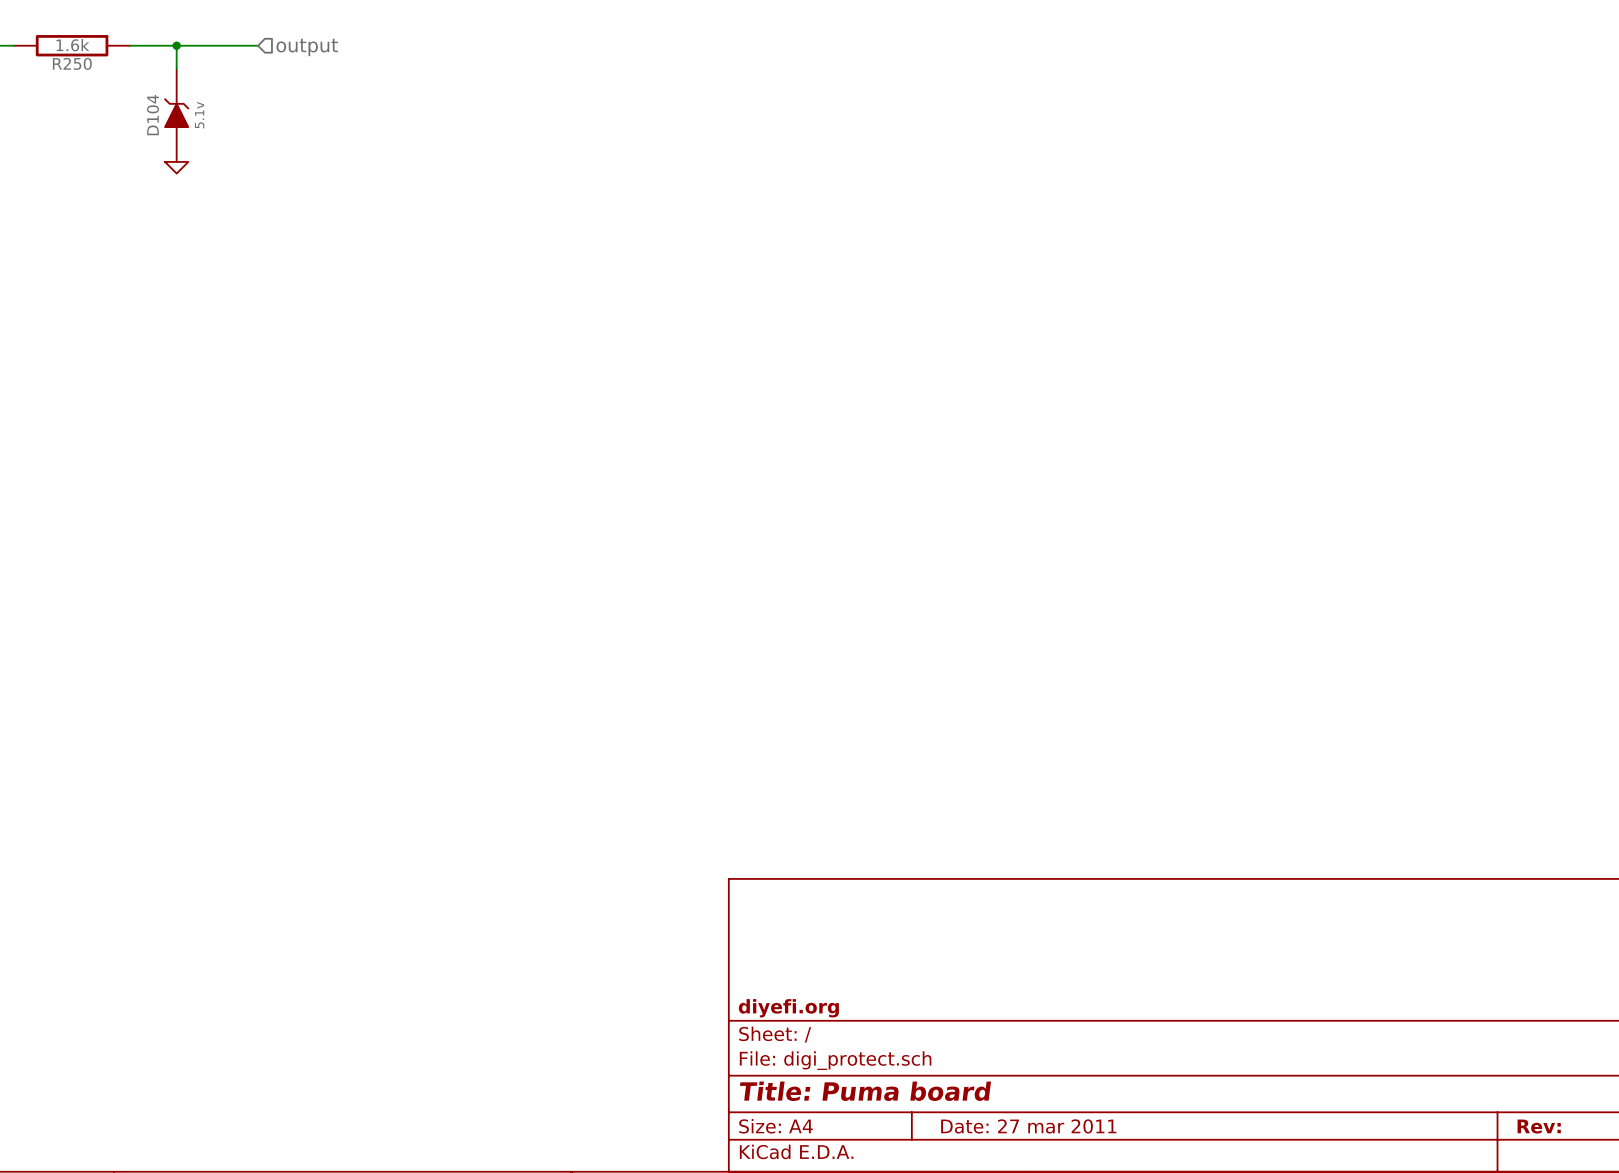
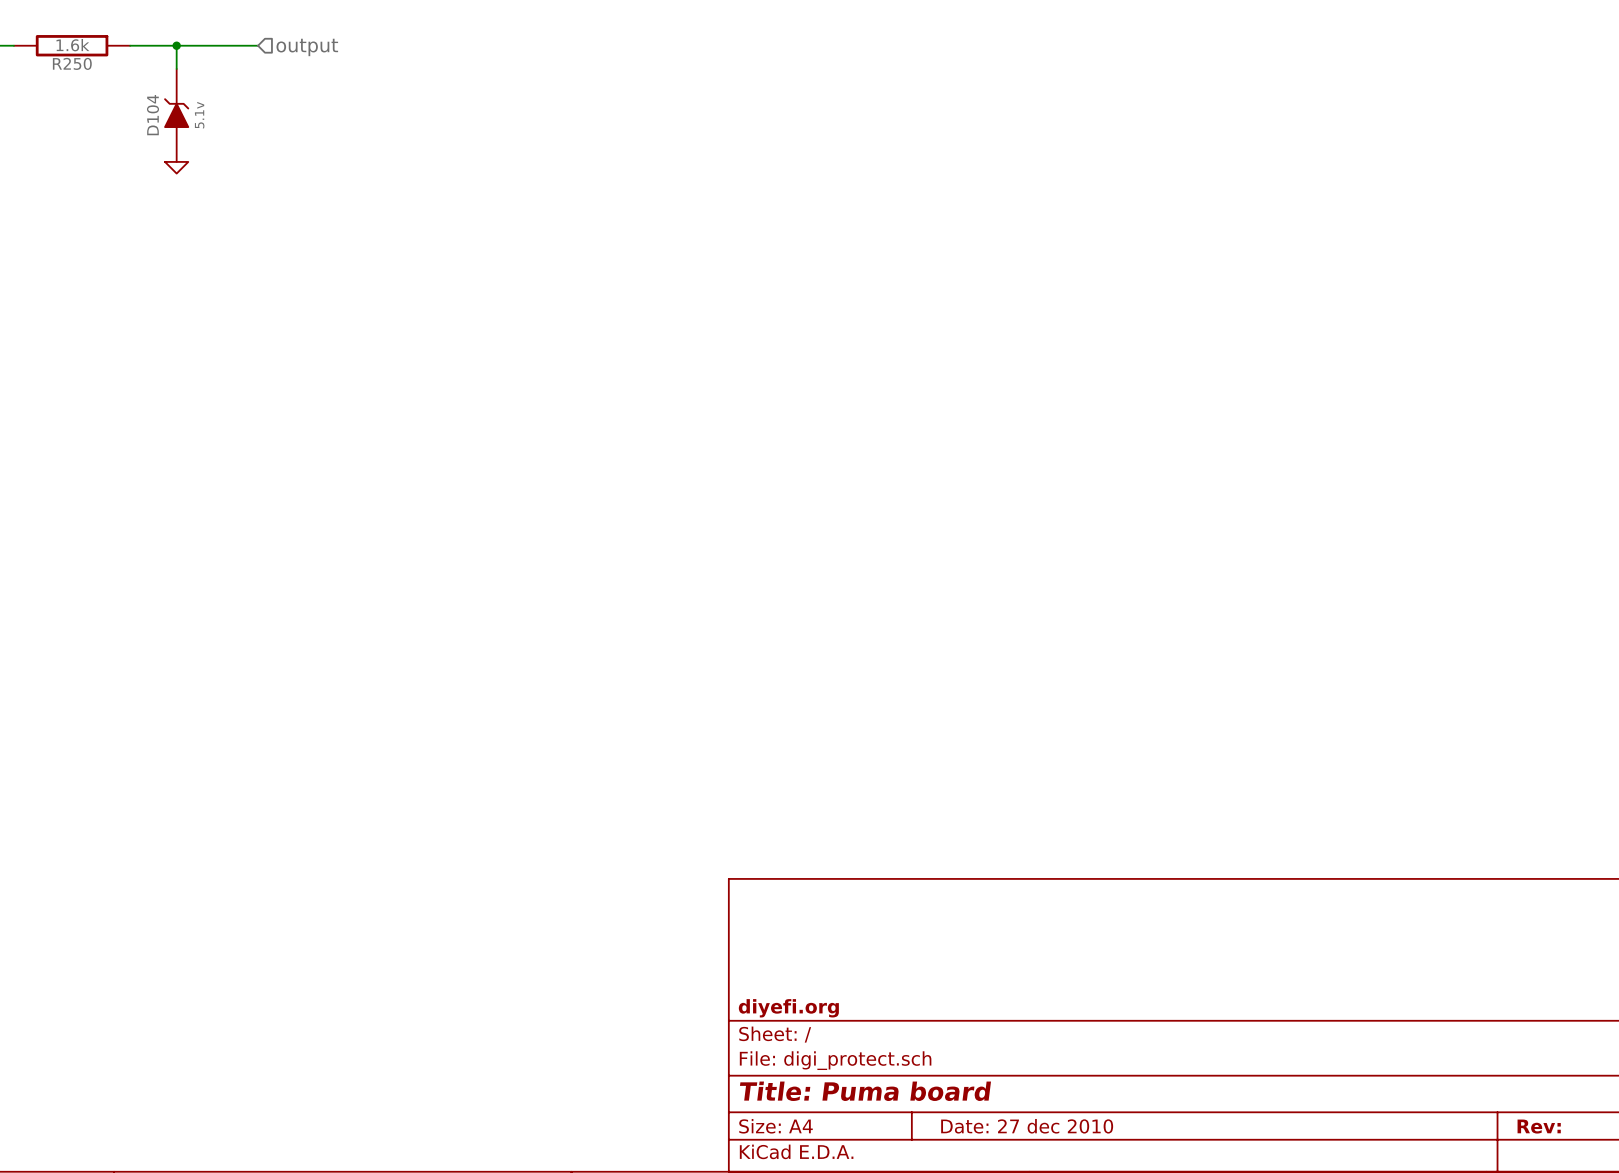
title block: Date: 27 mar 2011 (1028, 1126) -> Date: 27 dec 2010 (1027, 1126)

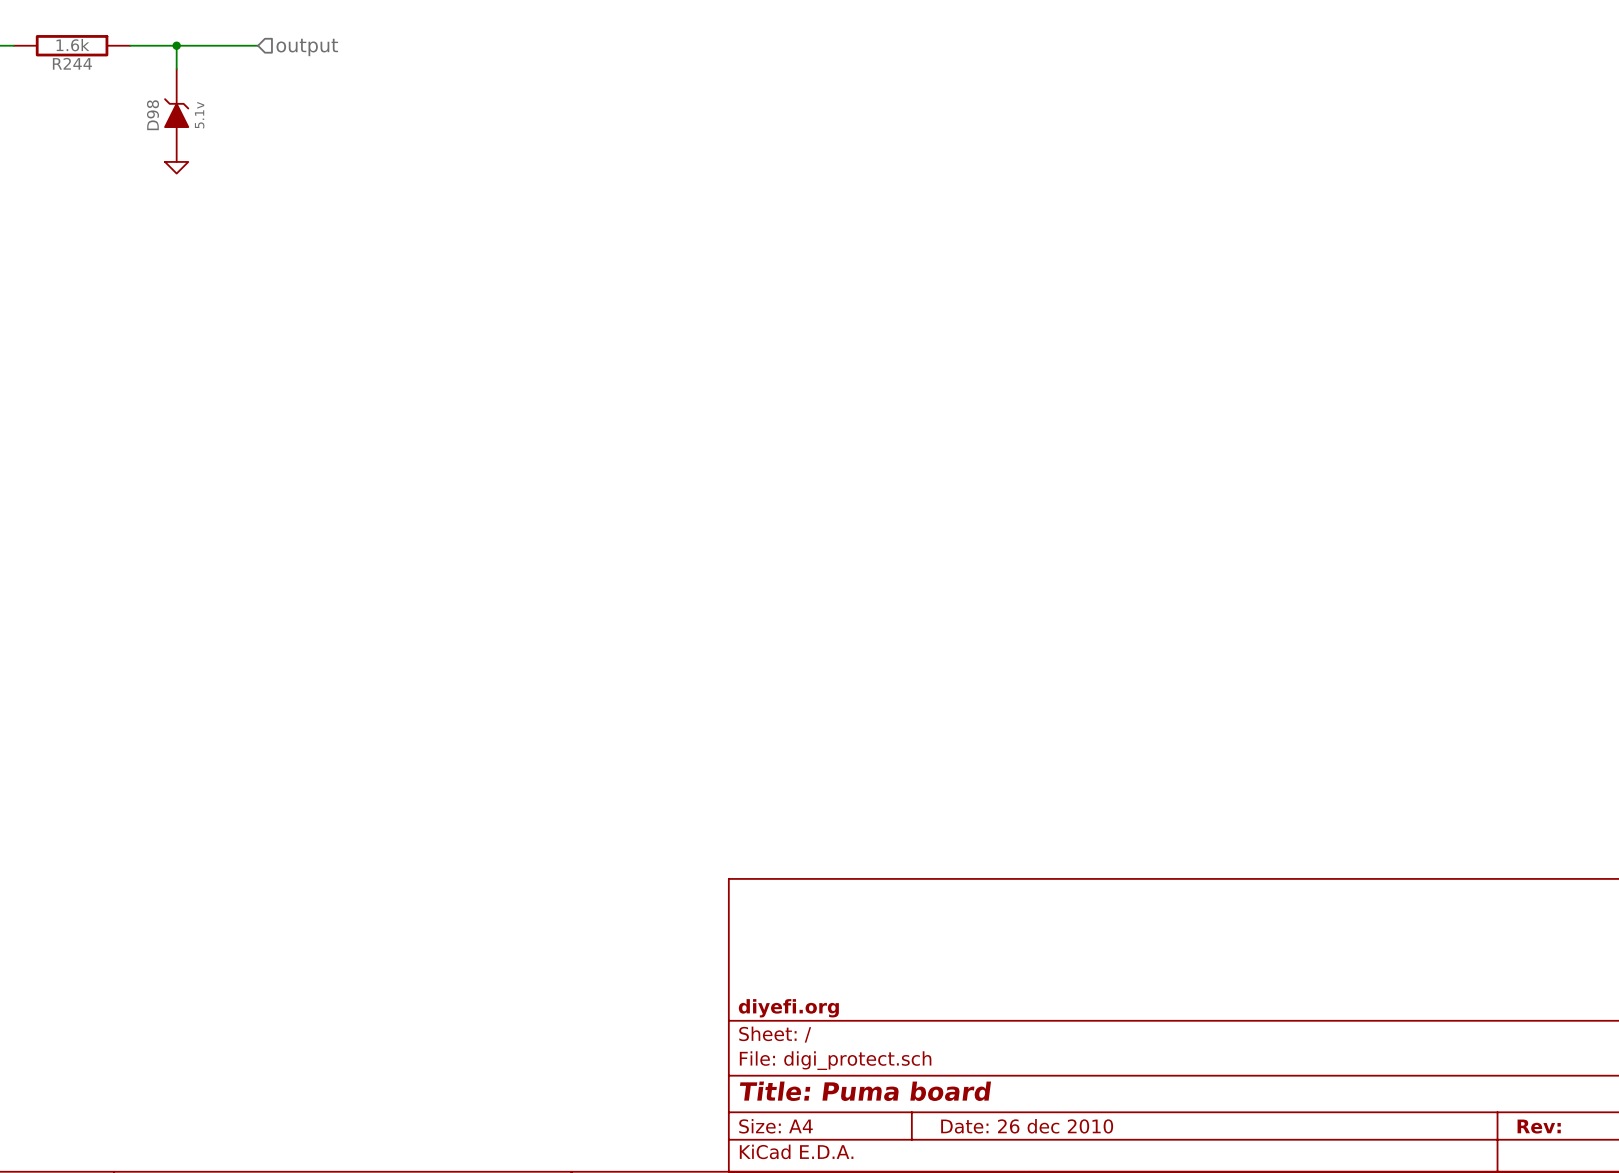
R250 name: R250 (72, 63) -> R244 (72, 63)
D104 name: D104 (152, 115) -> D98 (152, 115)
title block: Date: 27 dec 2010 (1027, 1126) -> Date: 26 dec 2010 (1027, 1126)

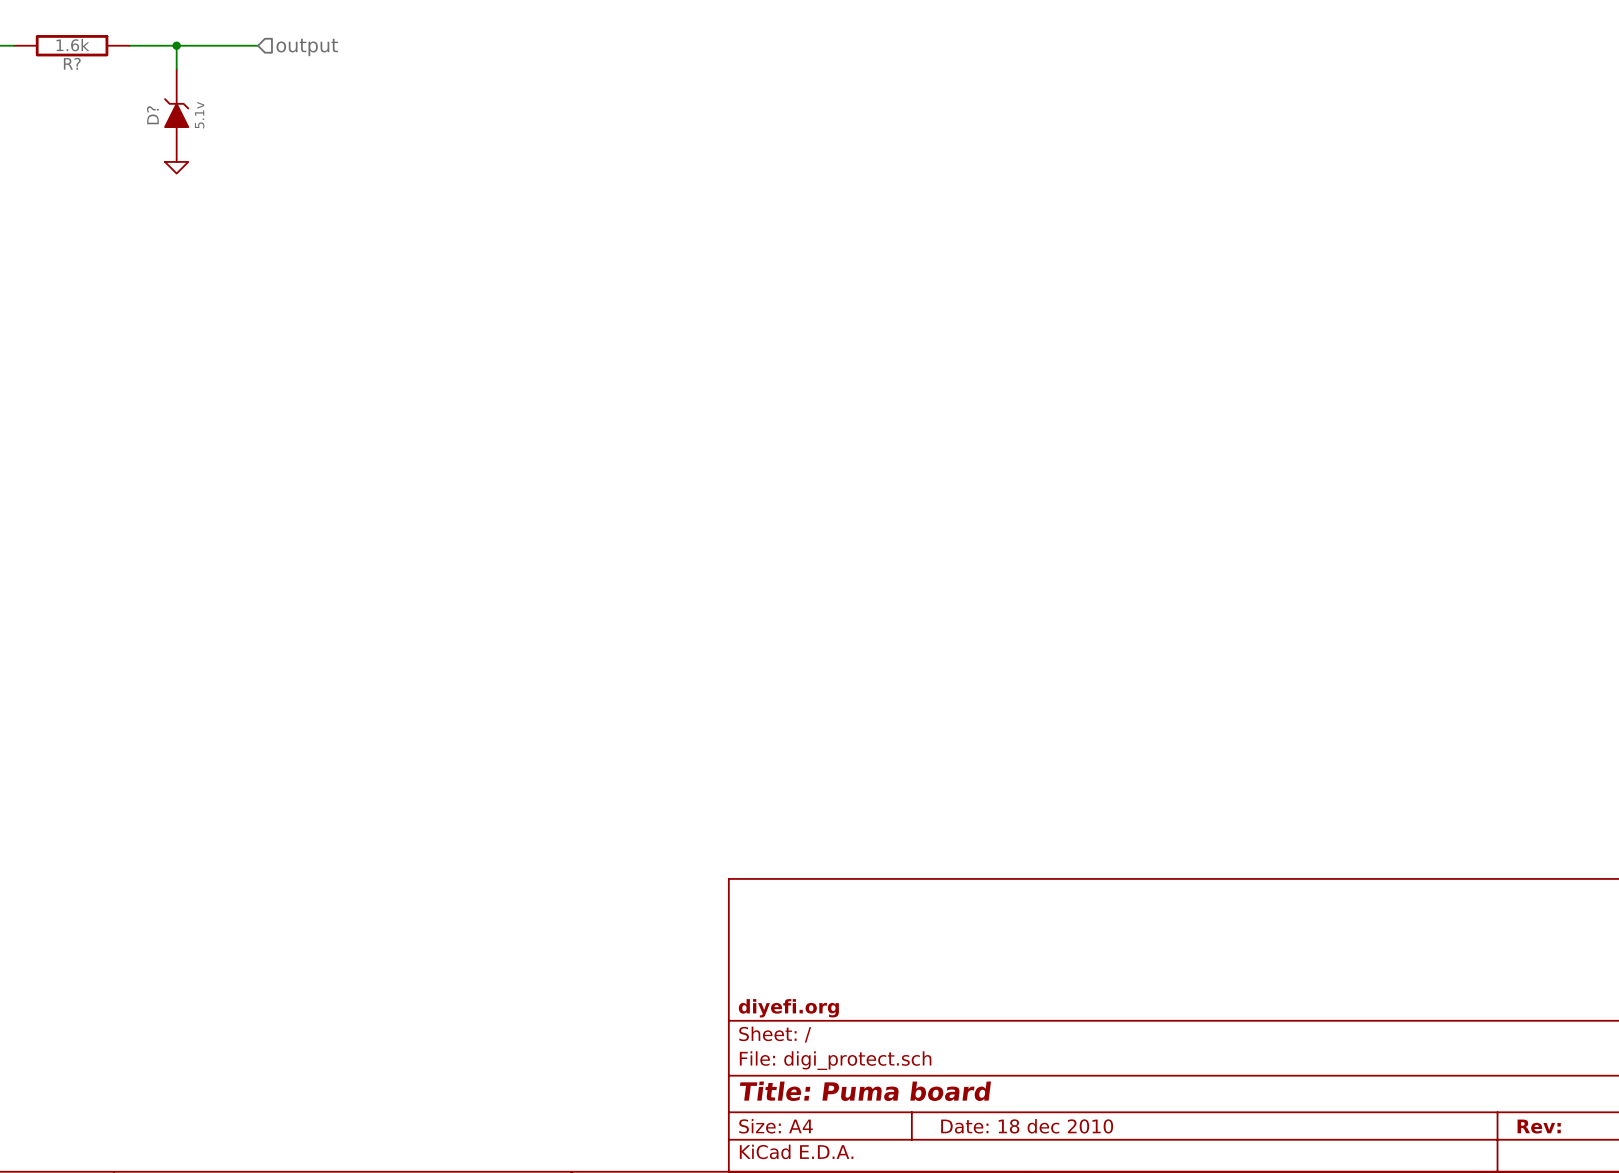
R244 name: R244 (72, 63) -> R? (72, 63)
D98 name: D98 (152, 115) -> D? (152, 115)
title block: Date: 26 dec 2010 (1027, 1126) -> Date: 18 dec 2010 (1027, 1126)

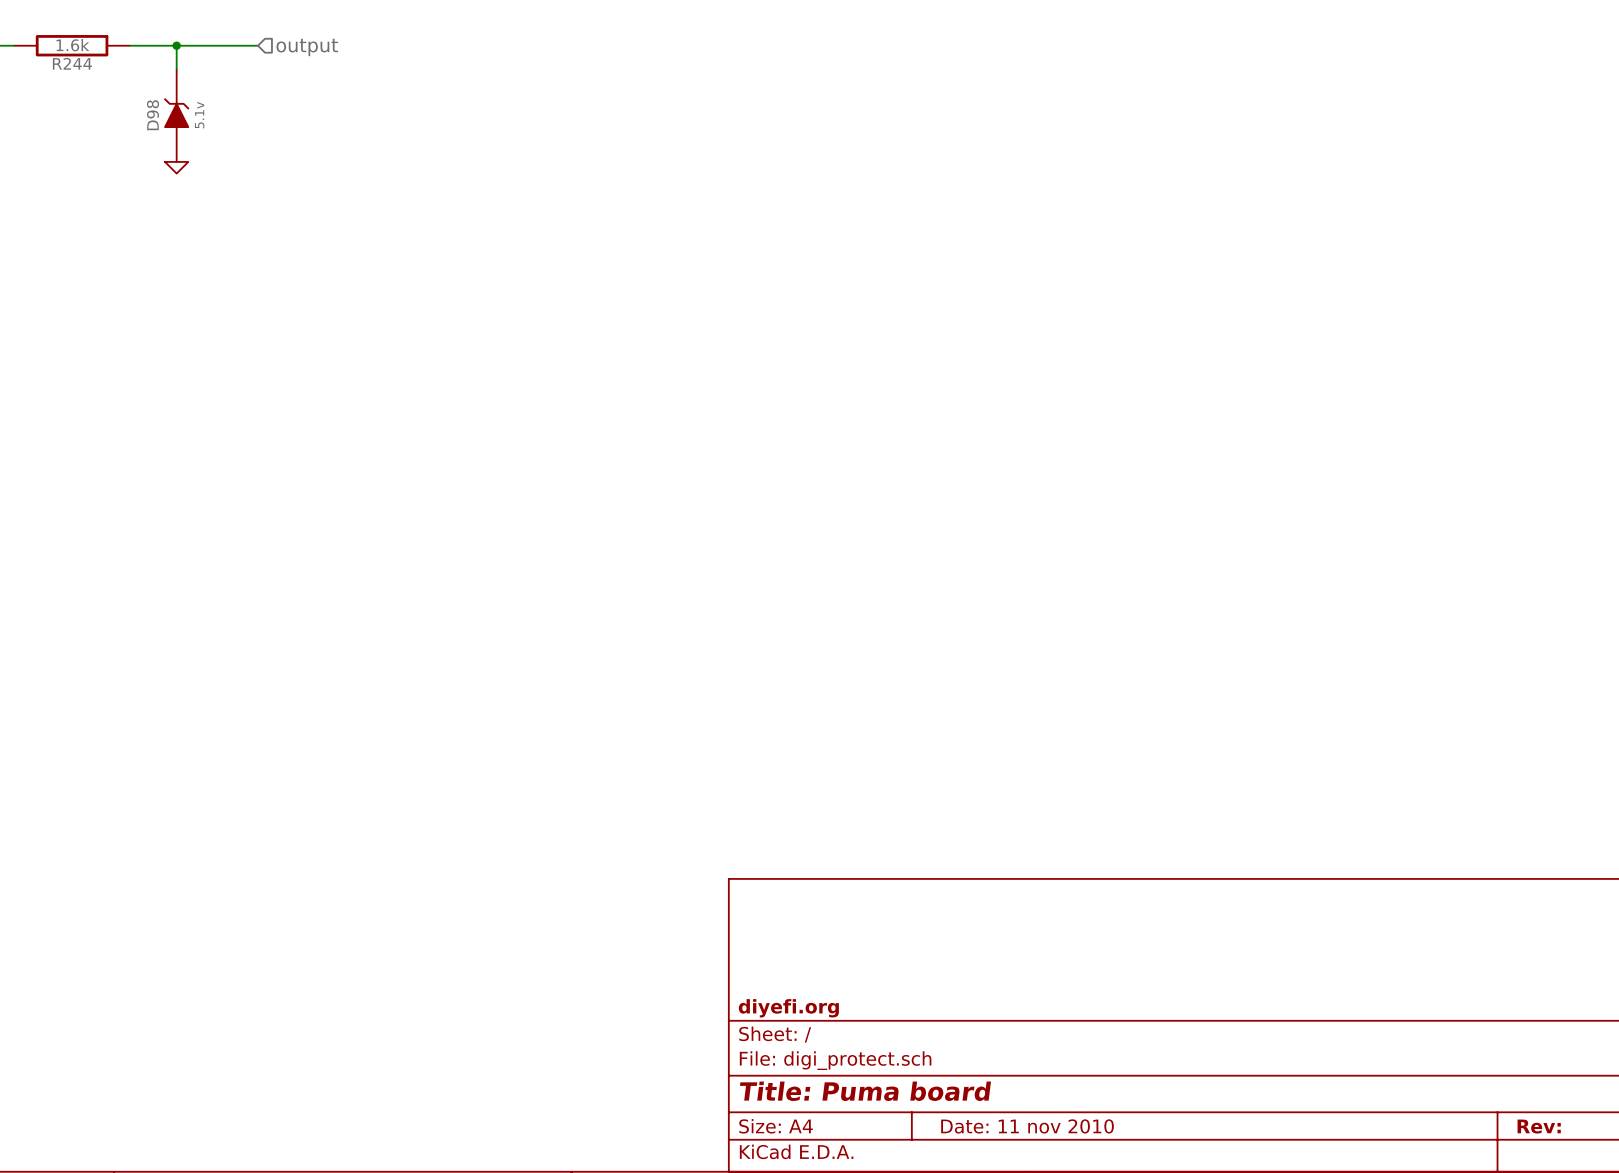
R? name: R? (72, 63) -> R244 (72, 63)
D? name: D? (152, 115) -> D98 (152, 115)
title block: Date: 18 dec 2010 (1027, 1126) -> Date: 11 nov 2010 (1027, 1126)

